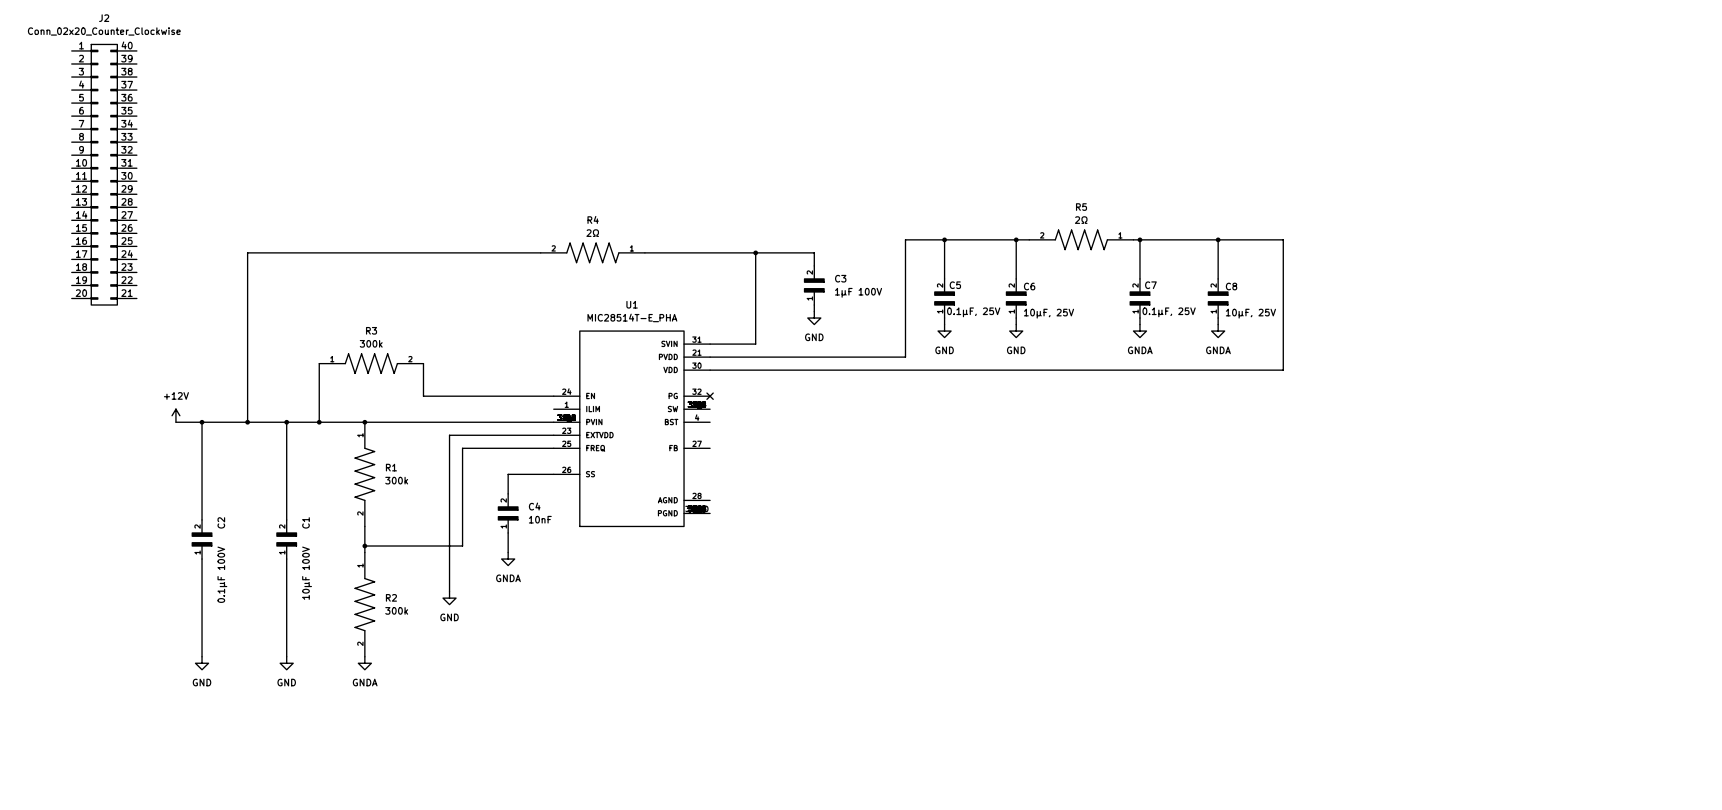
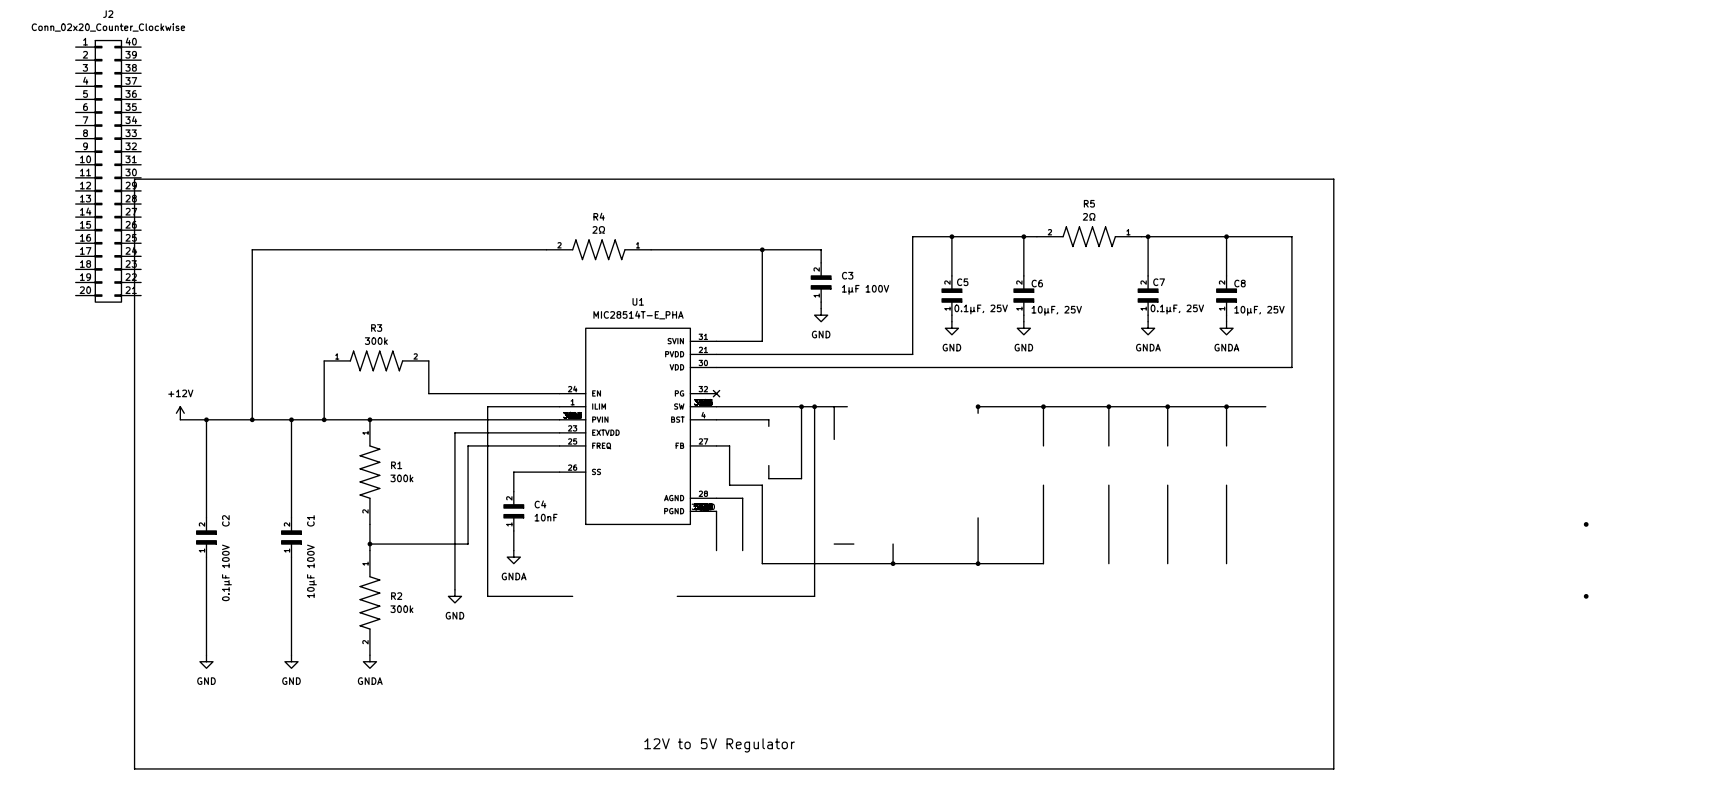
line: none -> (134, 179) (1333, 179) (1333, 768) (134, 768) (134, 179)
wire: none -> (559, 406) (487, 406) (487, 596) (572, 596)
wire: none -> (716, 406) (847, 406)
wire: none -> (801, 406) (801, 478) (768, 478) (768, 465)
junction: none -> (801, 406)
wire: none -> (814, 406) (814, 596) (677, 596)
junction: none -> (814, 406)
wire: none -> (834, 406) (834, 439)
junction: none -> (978, 406)
wire: none -> (1043, 406) (1043, 445)
junction: none -> (1043, 406)
wire: none -> (1108, 406) (1108, 445)
junction: none -> (1108, 406)
wire: none -> (1167, 406) (1167, 445)
junction: none -> (1167, 406)
wire: none -> (1226, 406) (1226, 445)
junction: none -> (1226, 406)
wire: none -> (1265, 406) (978, 406) (978, 413)
wire: none -> (716, 419) (768, 419) (768, 426)
wire: none -> (716, 445) (729, 445) (729, 485) (762, 485) (762, 563) (1043, 563) (1043, 485)
wire: none -> (1108, 485) (1108, 563)
wire: none -> (1167, 485) (1167, 563)
wire: none -> (1226, 485) (1226, 563)
wire: none -> (716, 498) (742, 498) (742, 550)
wire: none -> (716, 511) (716, 550)
wire: none -> (978, 517) (978, 563)
junction: none -> (1586, 524)
wire: none -> (834, 544) (853, 544)
wire: none -> (893, 544) (893, 563)
junction: none -> (893, 563)
junction: none -> (978, 563)
junction: none -> (1586, 596)
text: none -> 12V to 5V Regulator (719, 745)

